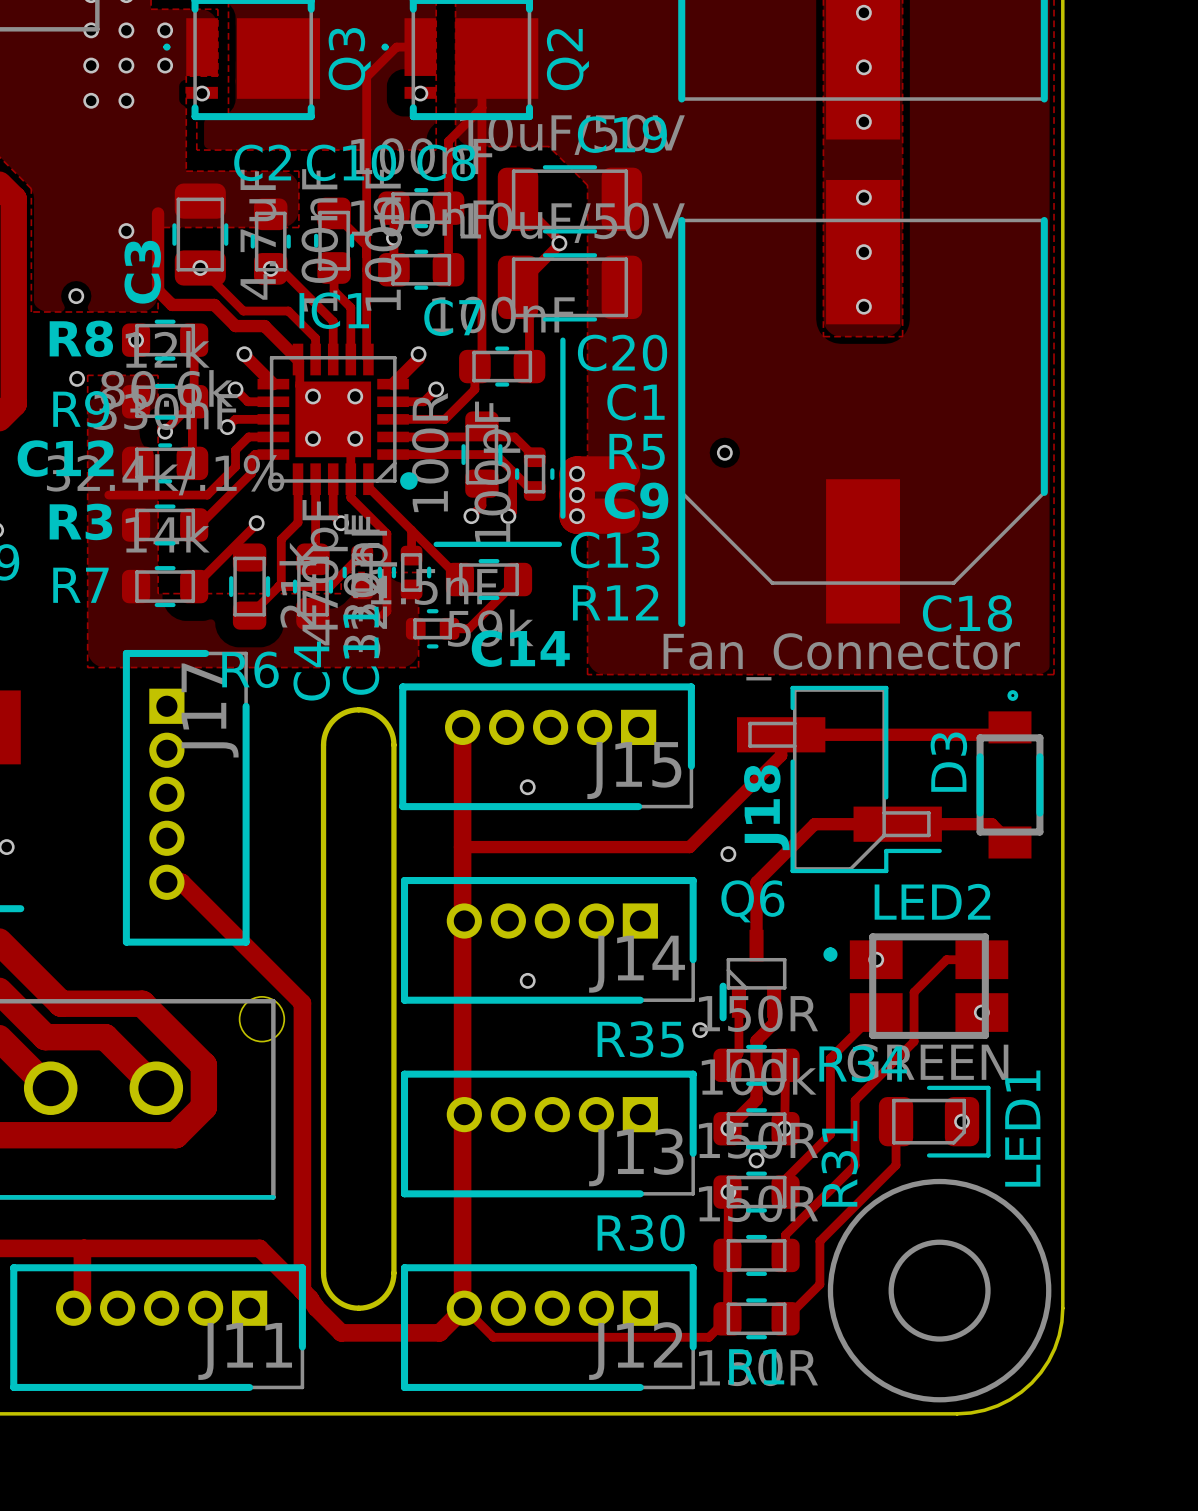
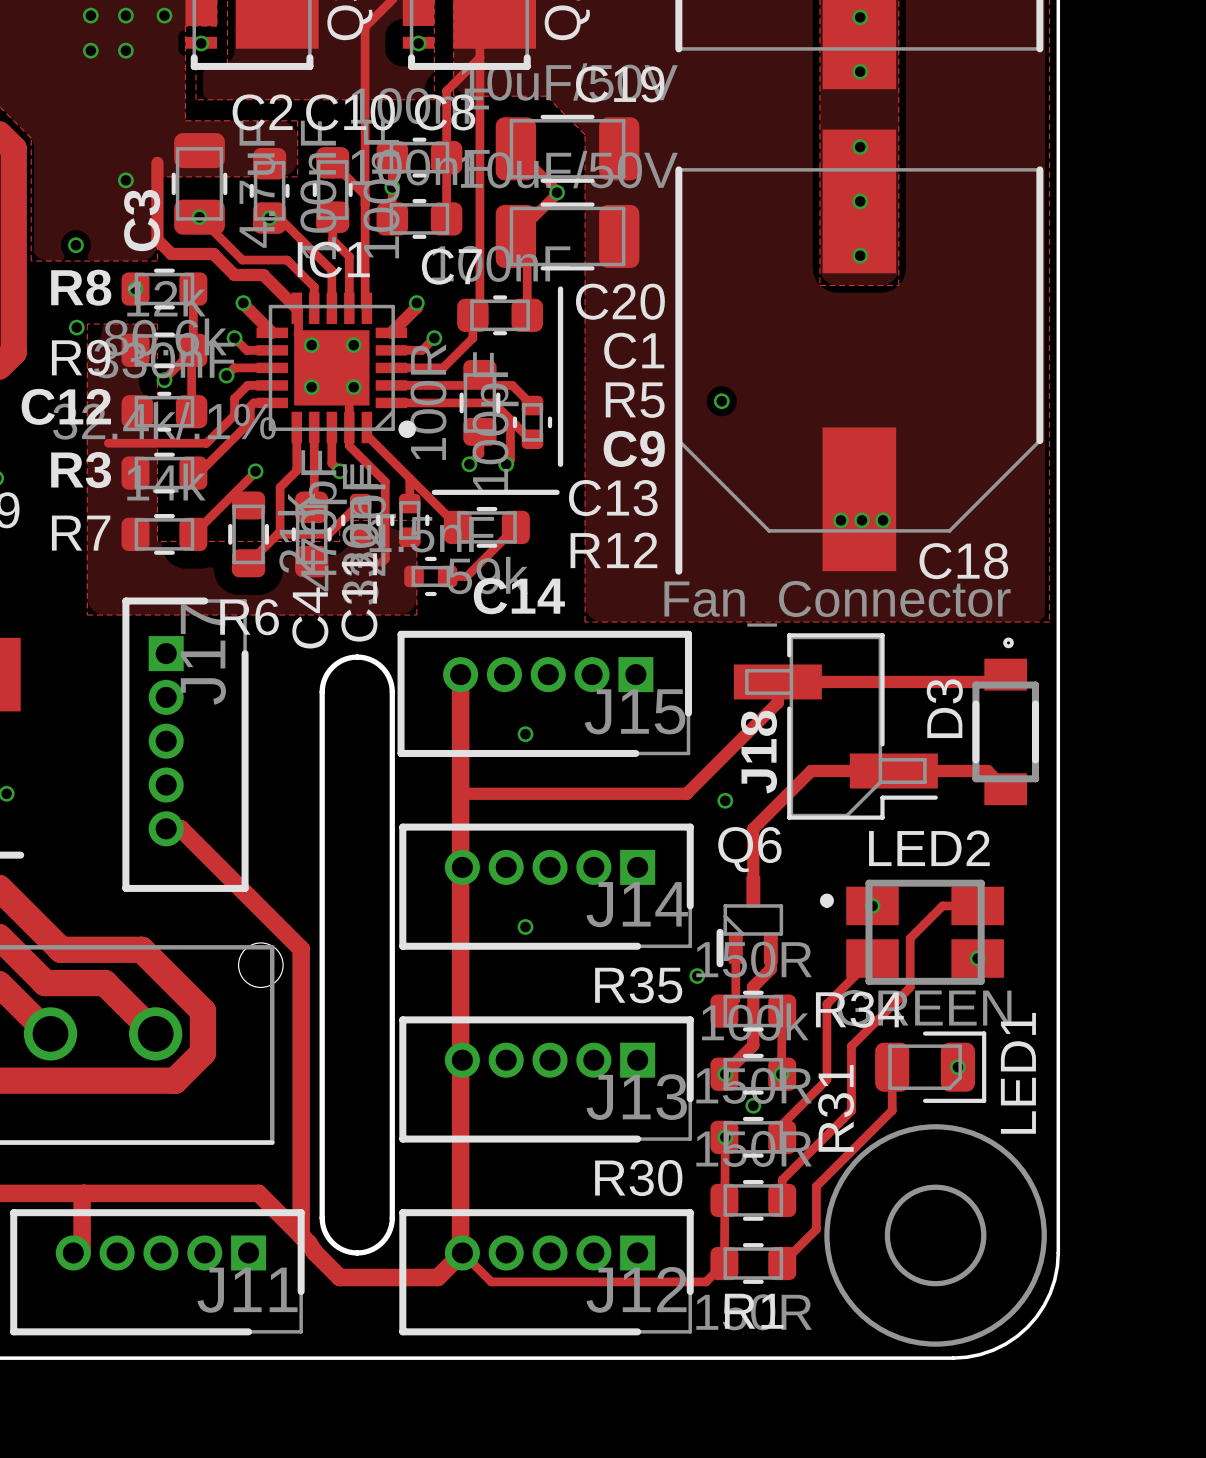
via: (577, 473) -> none
track: (622, 473) (577, 473) (577, 516) (622, 516) -> none
via: (577, 495) -> none
via: (577, 516) -> none
via: none -> (840, 520)
via: none -> (861, 520)
via: none -> (883, 520)

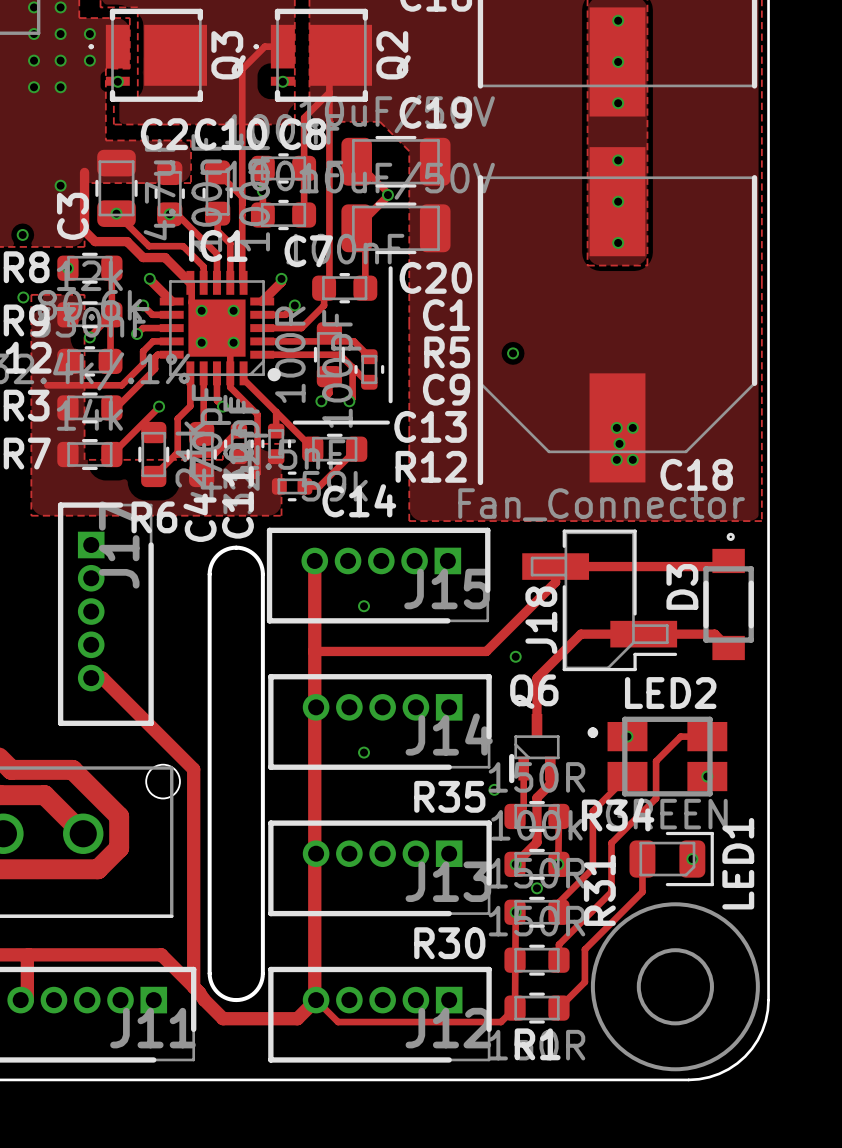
via: none -> (616, 427)
via: none -> (632, 427)
via: (840, 520) -> none
via: (883, 520) -> none
via: none -> (616, 459)
via: none -> (632, 459)

